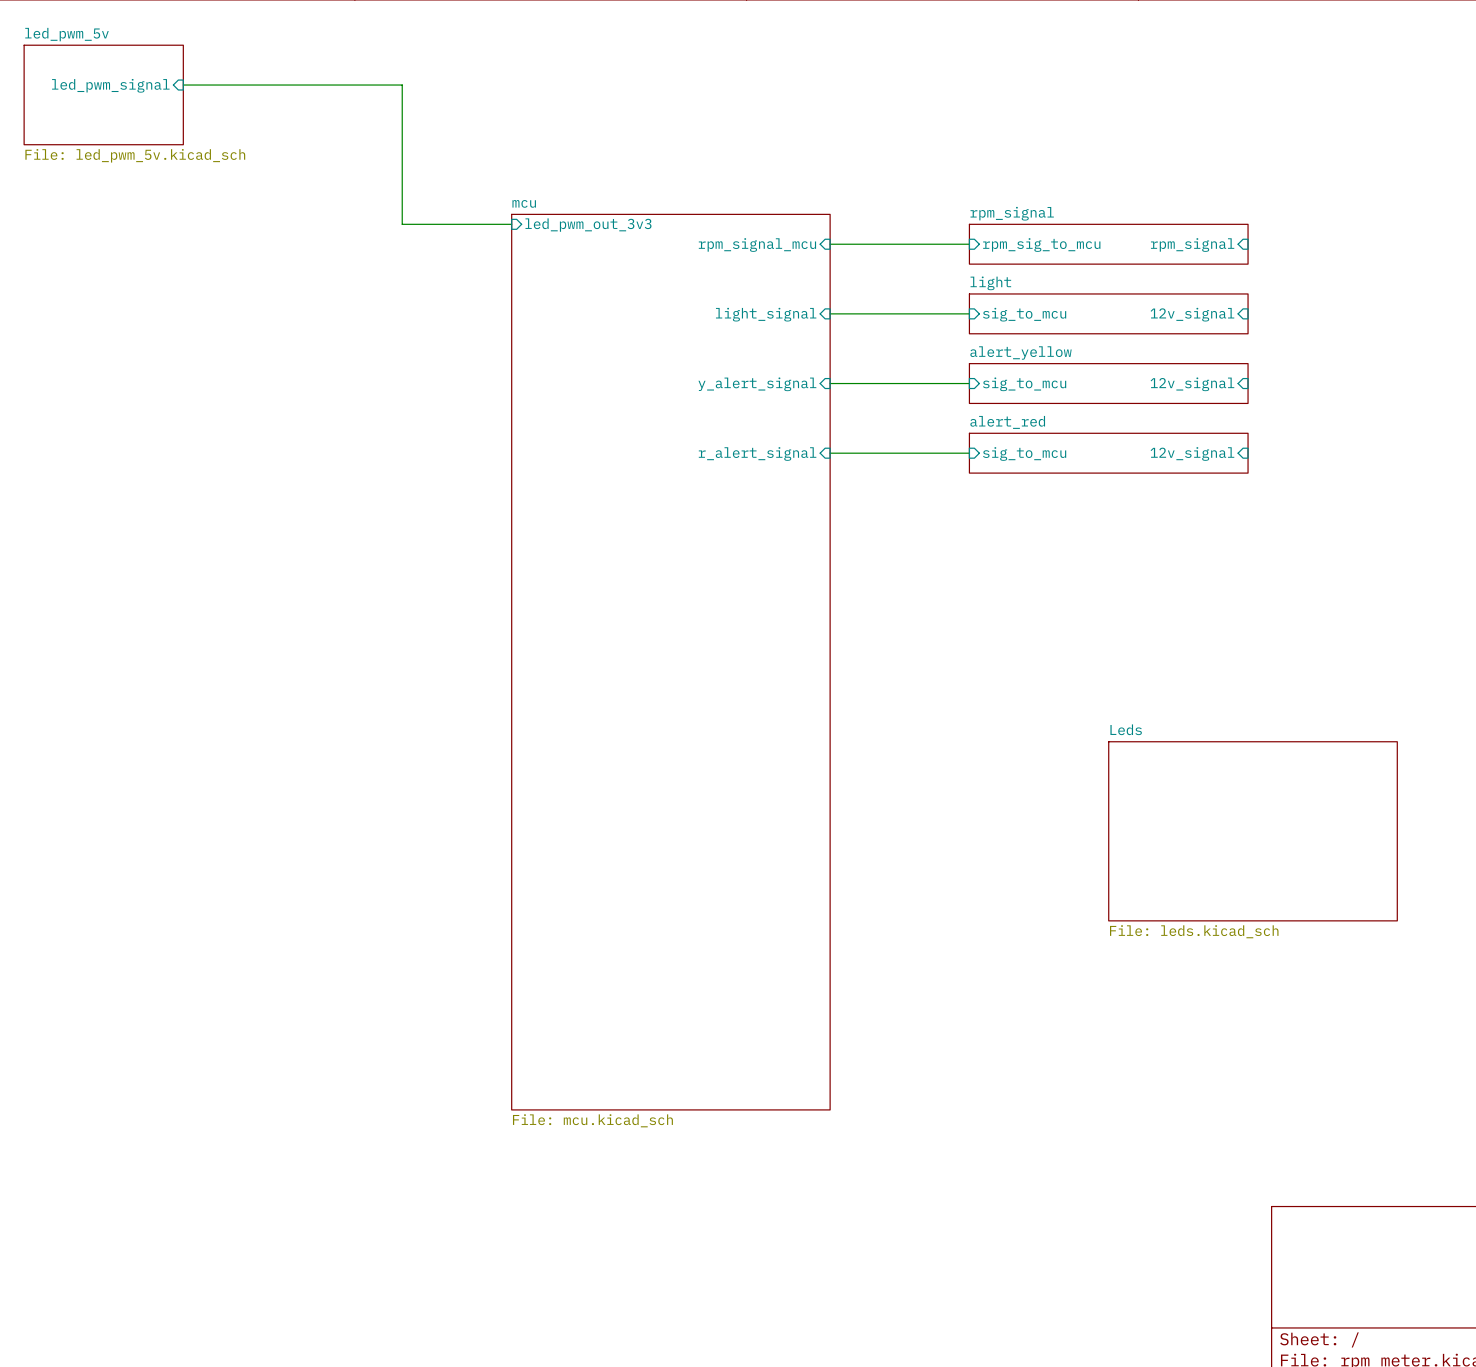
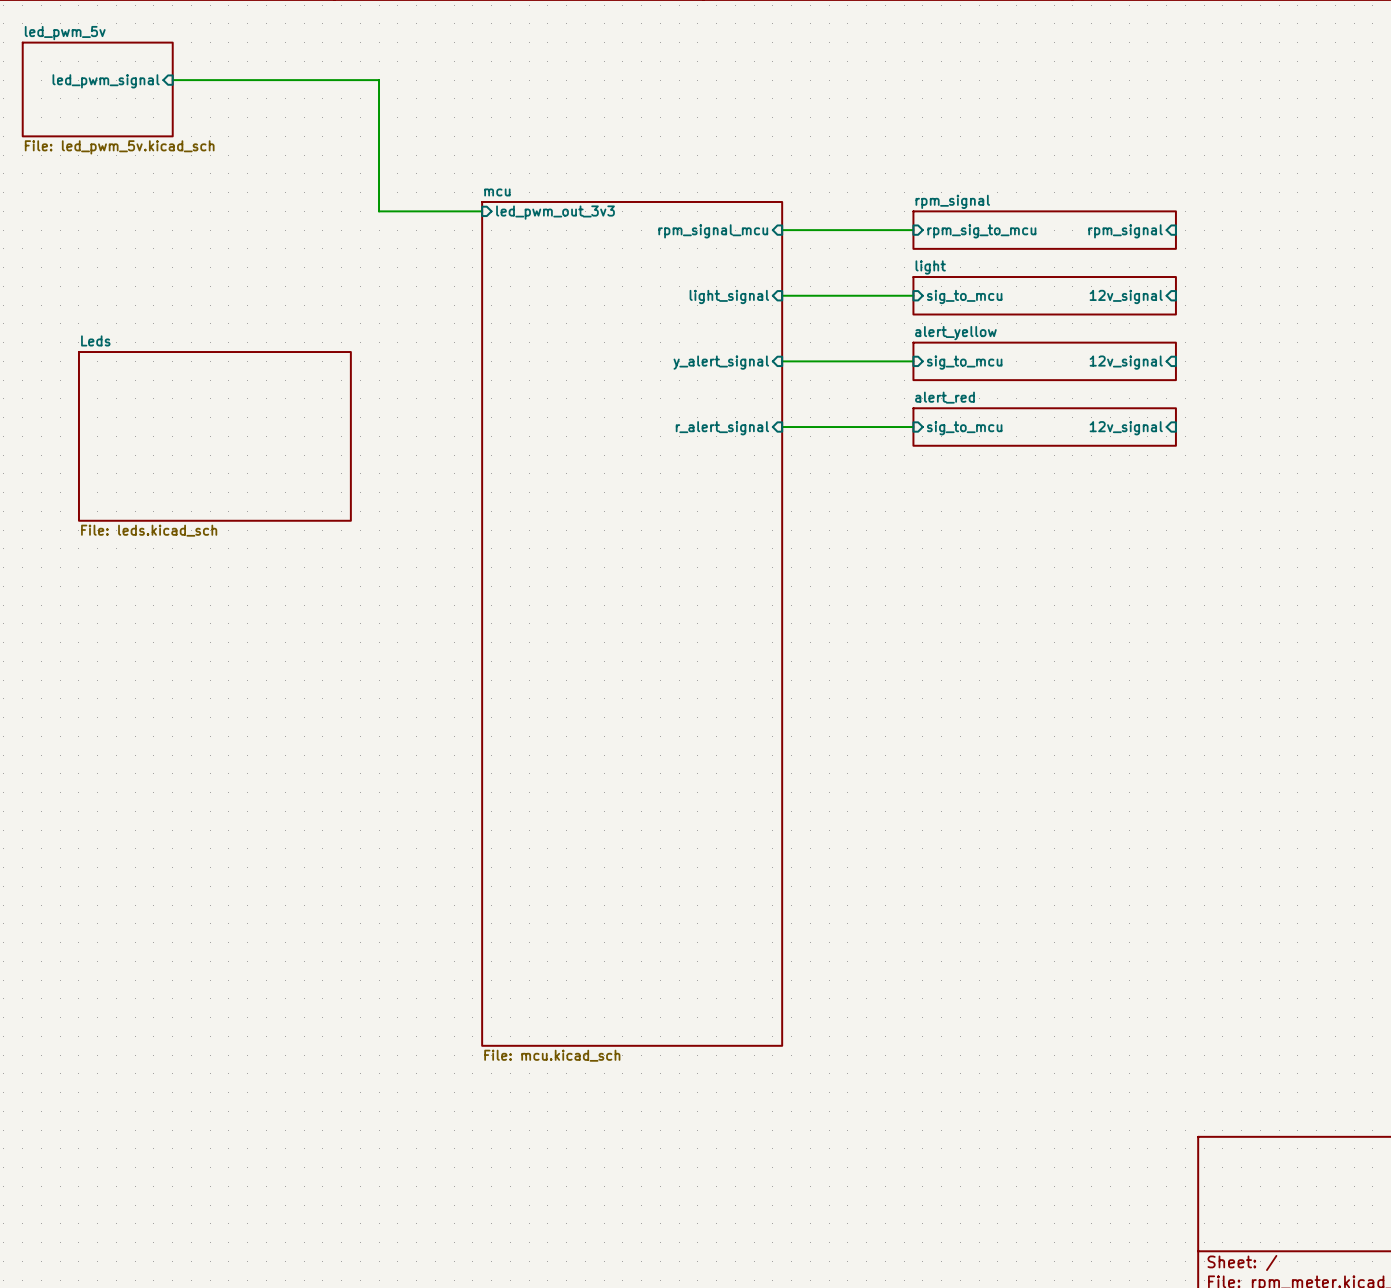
sheet Leds: none -> File: leds.kicad_sch (214, 436)
sheet Leds: File: leds.kicad_sch (1253, 831) -> none

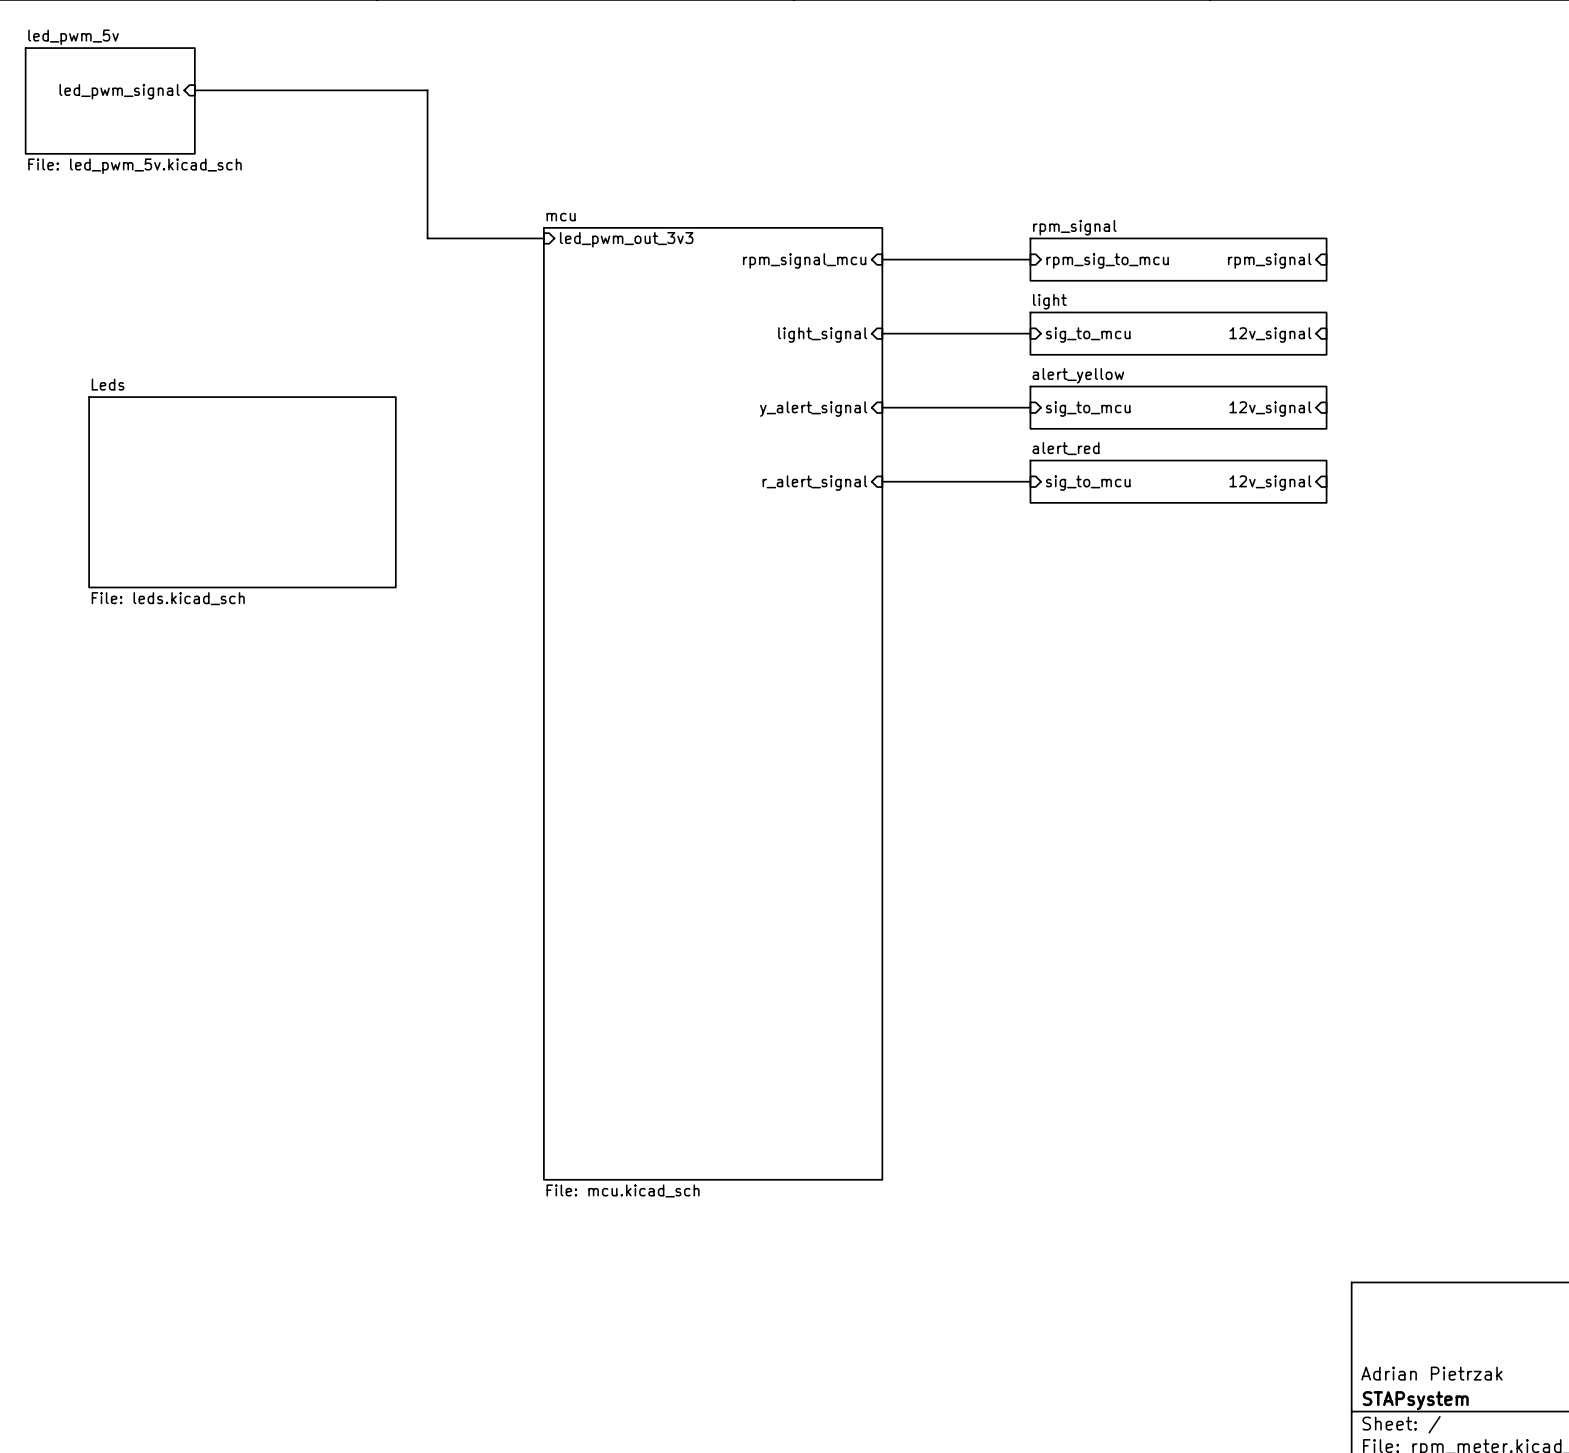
title block: none -> Adrian Pietrzak (1431, 1373)
title block: none -> STAPsystem (1415, 1400)

